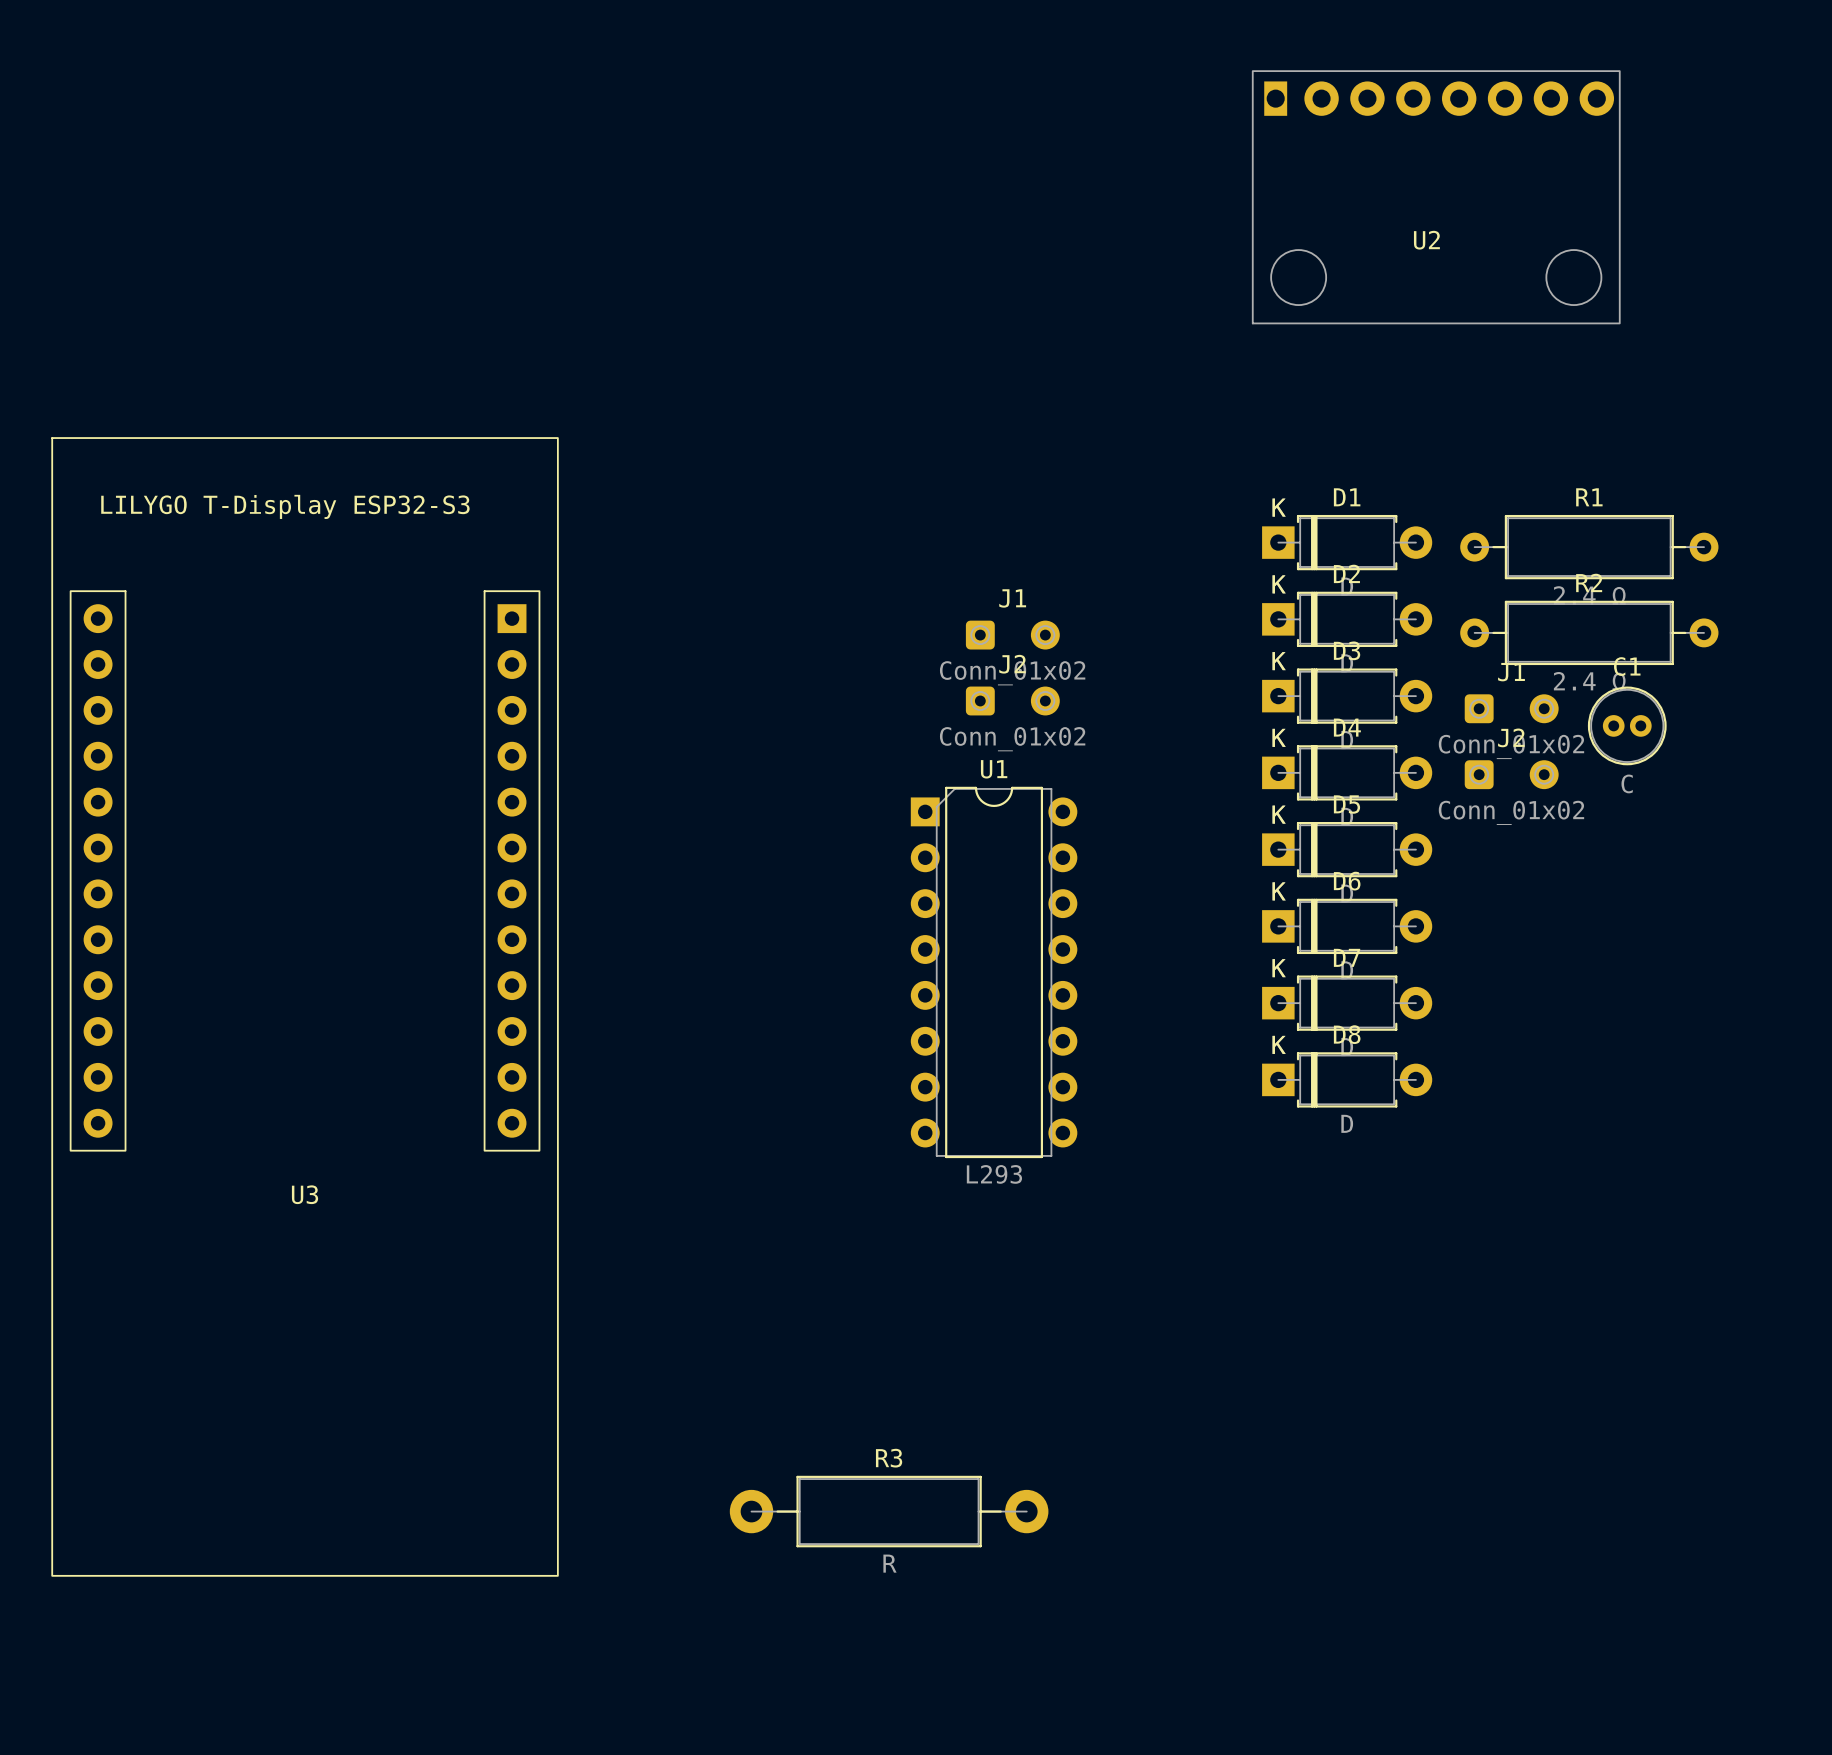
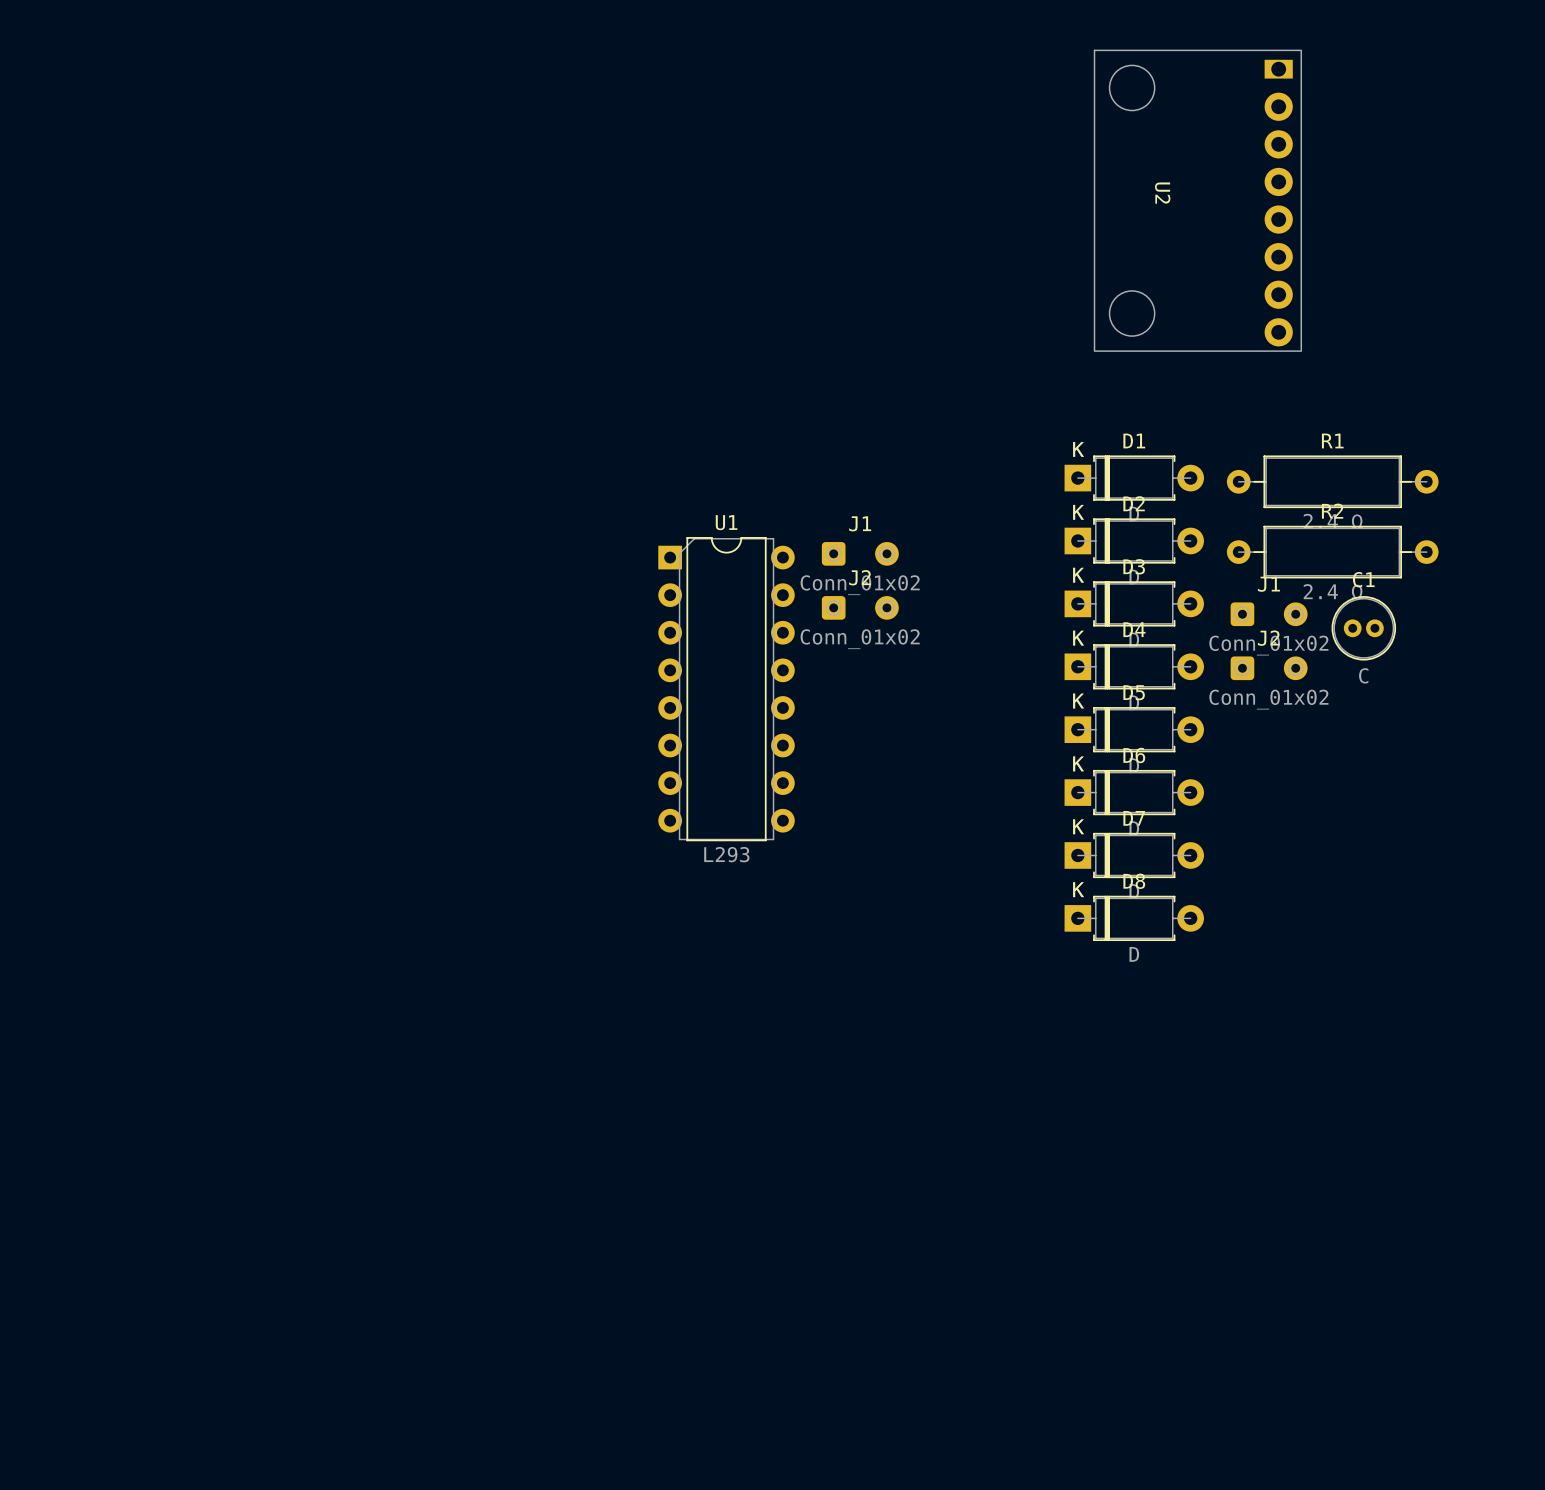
U2 rotation: 0° (1436, 197) -> 90° clockwise (1197, 200)
U1 position: (994, 972) -> (726, 689)
U3: (305, 1006) -> none
R3: R (889, 1511) -> none

